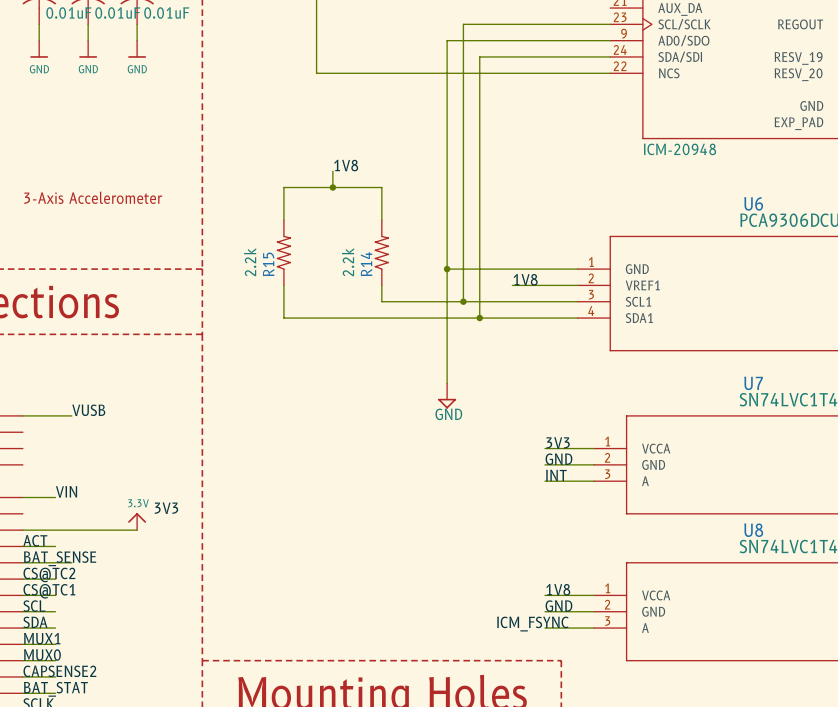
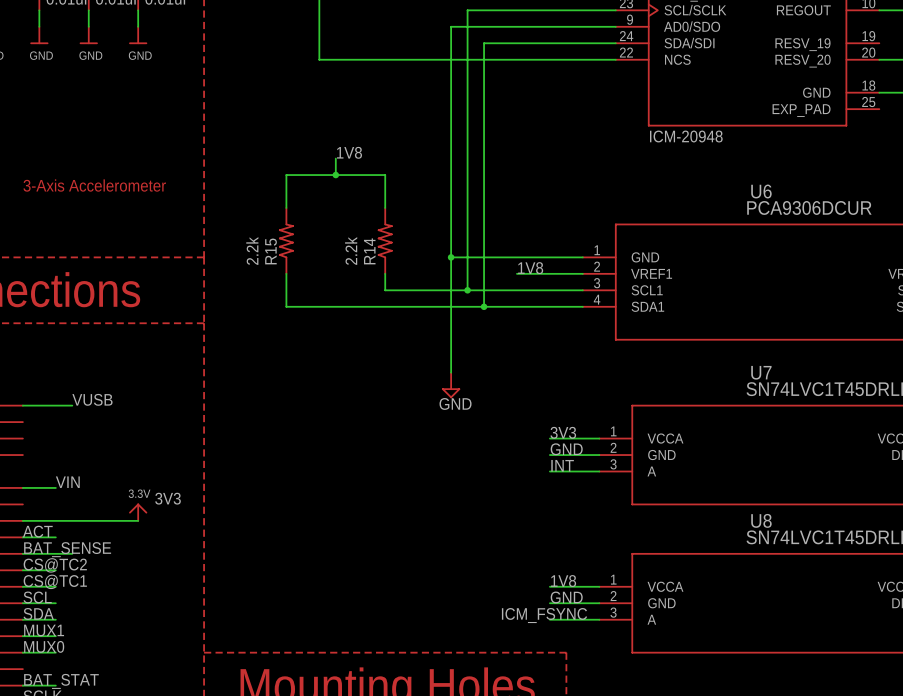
label: CAPSENSE2 (59, 671) -> none
wire: (22, 676) (55, 676) -> none

